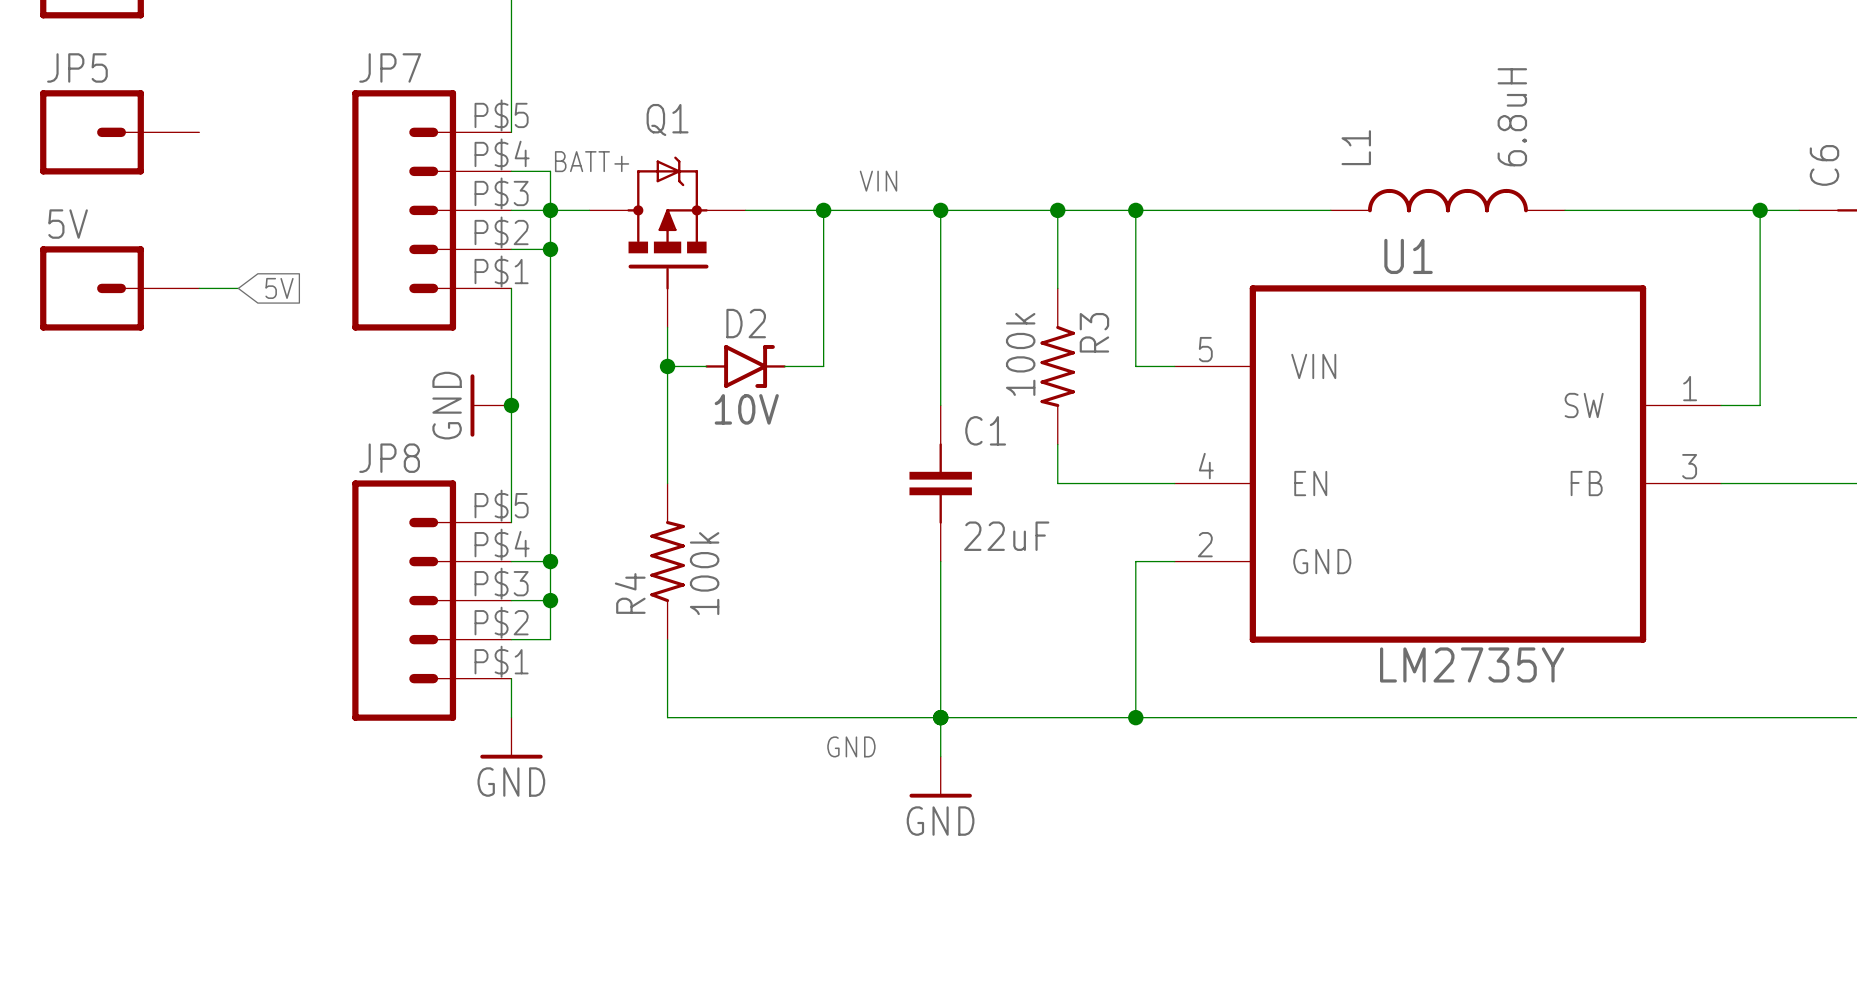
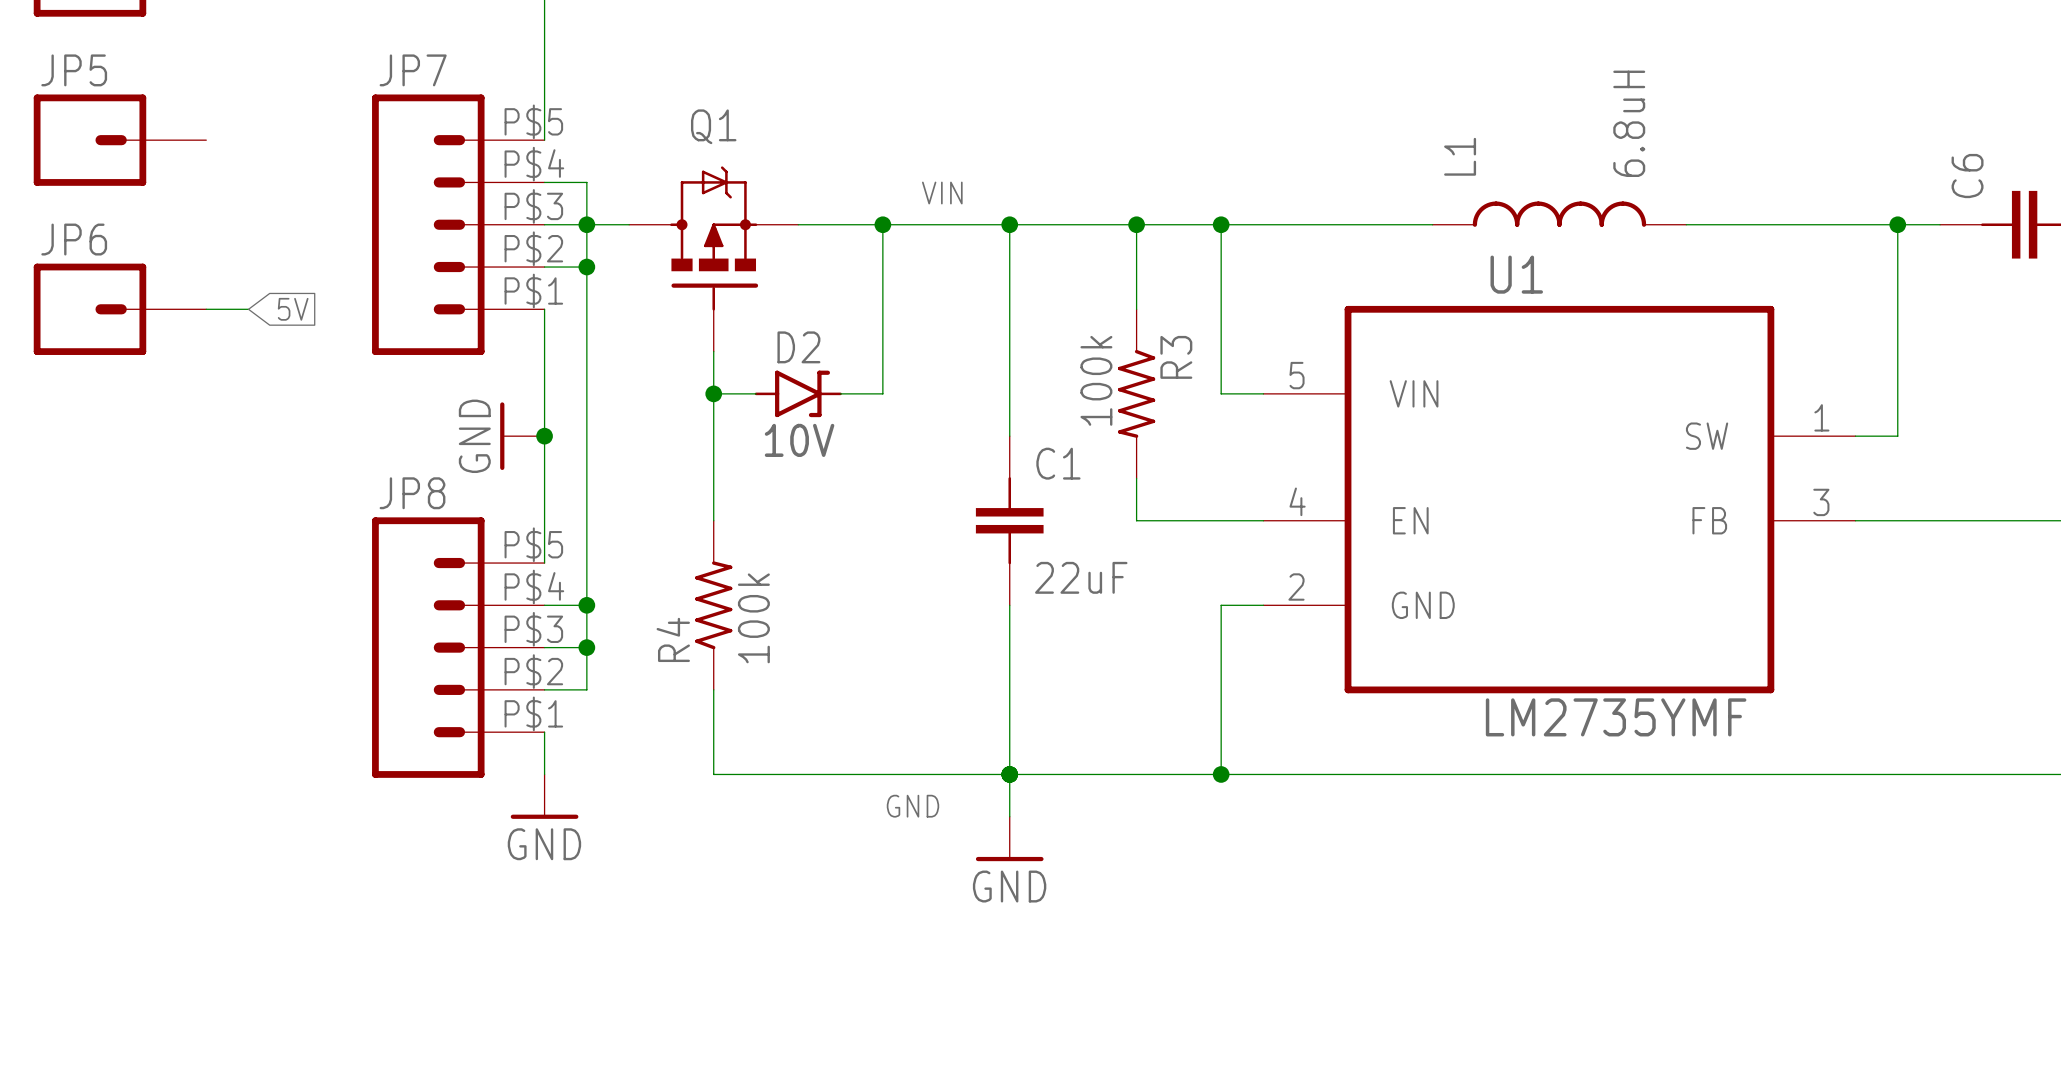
label: BATT+ (592, 161) -> none
5V name: 5V (68, 224) -> JP6 (74, 239)
U1 value: LM2735Y (1472, 664) -> LM2735YMF (1616, 717)

